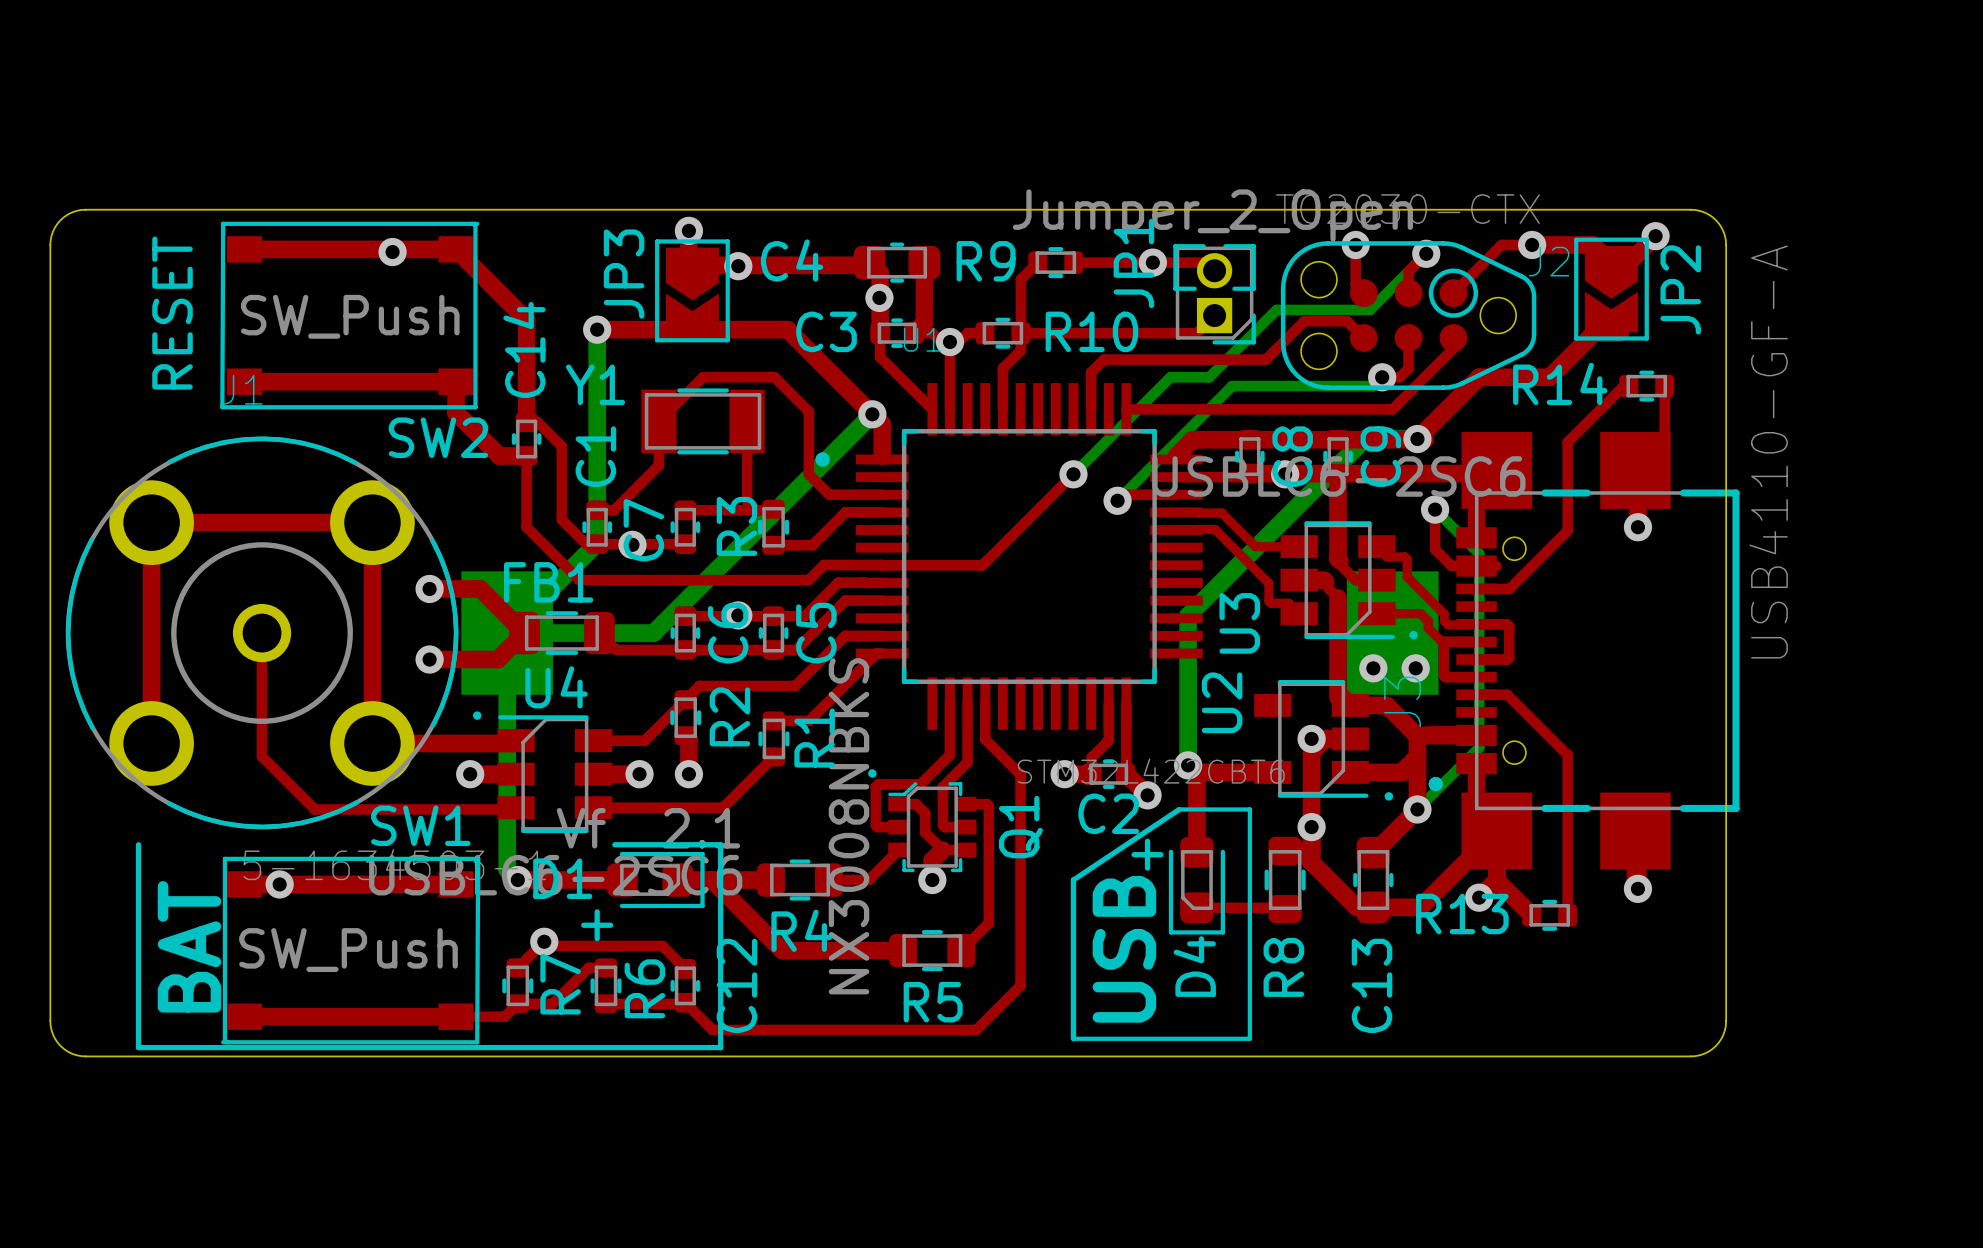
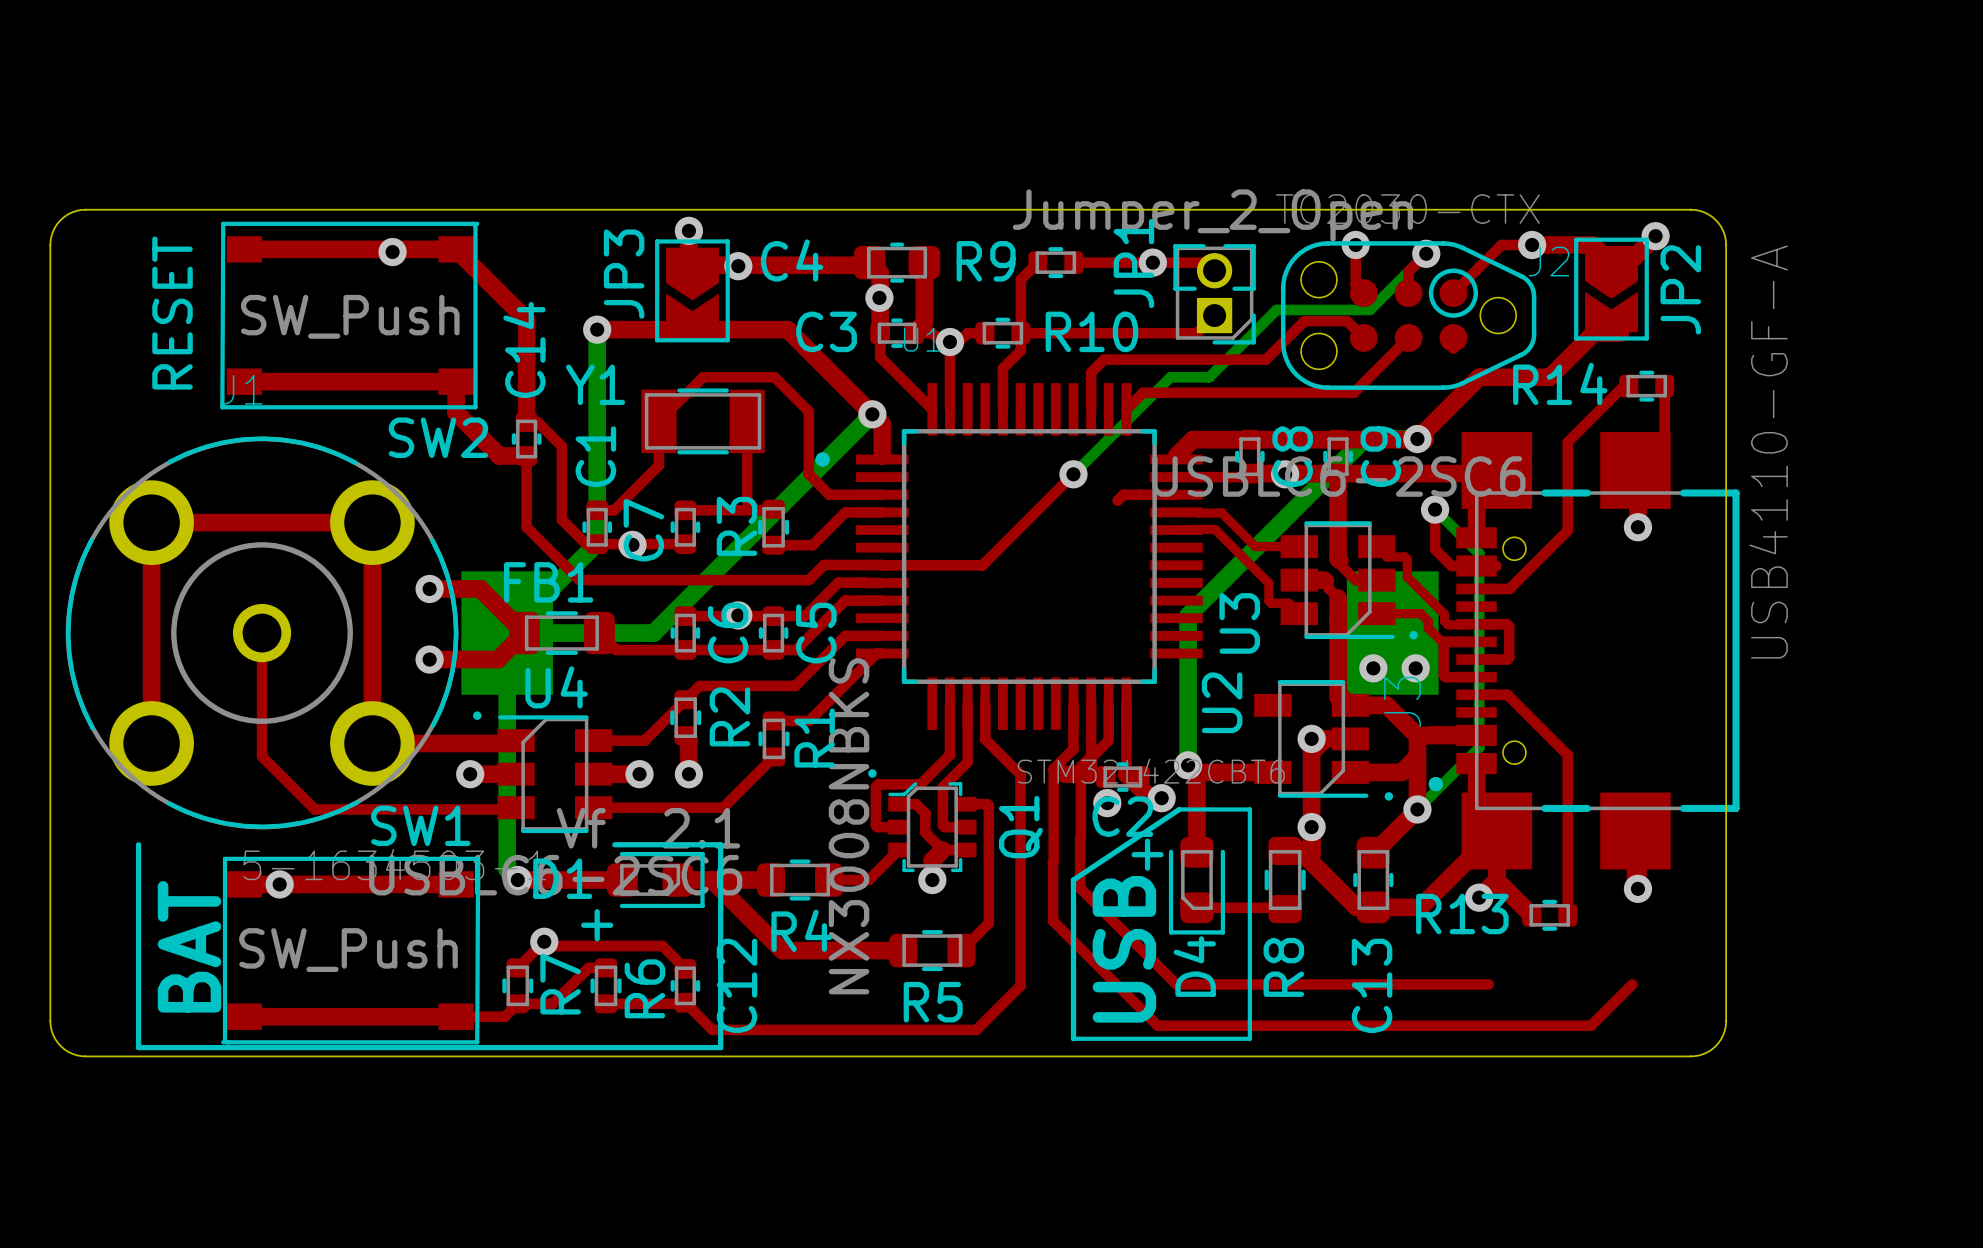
top track: (1408, 337) (1408, 368) (1399, 377) (1382, 377) -> none
top track: (1453, 348) (1392, 409) (1126, 409) -> (1408, 337) (1353, 392) (1142, 392) (1126, 409)
bottom track: (1382, 377) (1373, 386) (1232, 386) (1117, 500) -> none
via: (1382, 377) -> none
via: (1117, 500) -> none
top track: none -> (1073, 703) (1073, 749) (1053, 768) (1053, 920) (1157, 1025) (1591, 1025) (1632, 984)
top track: none -> (1091, 703) (1091, 756) (1080, 766) (1080, 888) (1176, 984) (1488, 984)
via: (1064, 774) -> none
C2 position: (1108, 774) -> (1122, 777)
via position: (1147, 795) -> (1161, 798)
via: none -> (1107, 803)

